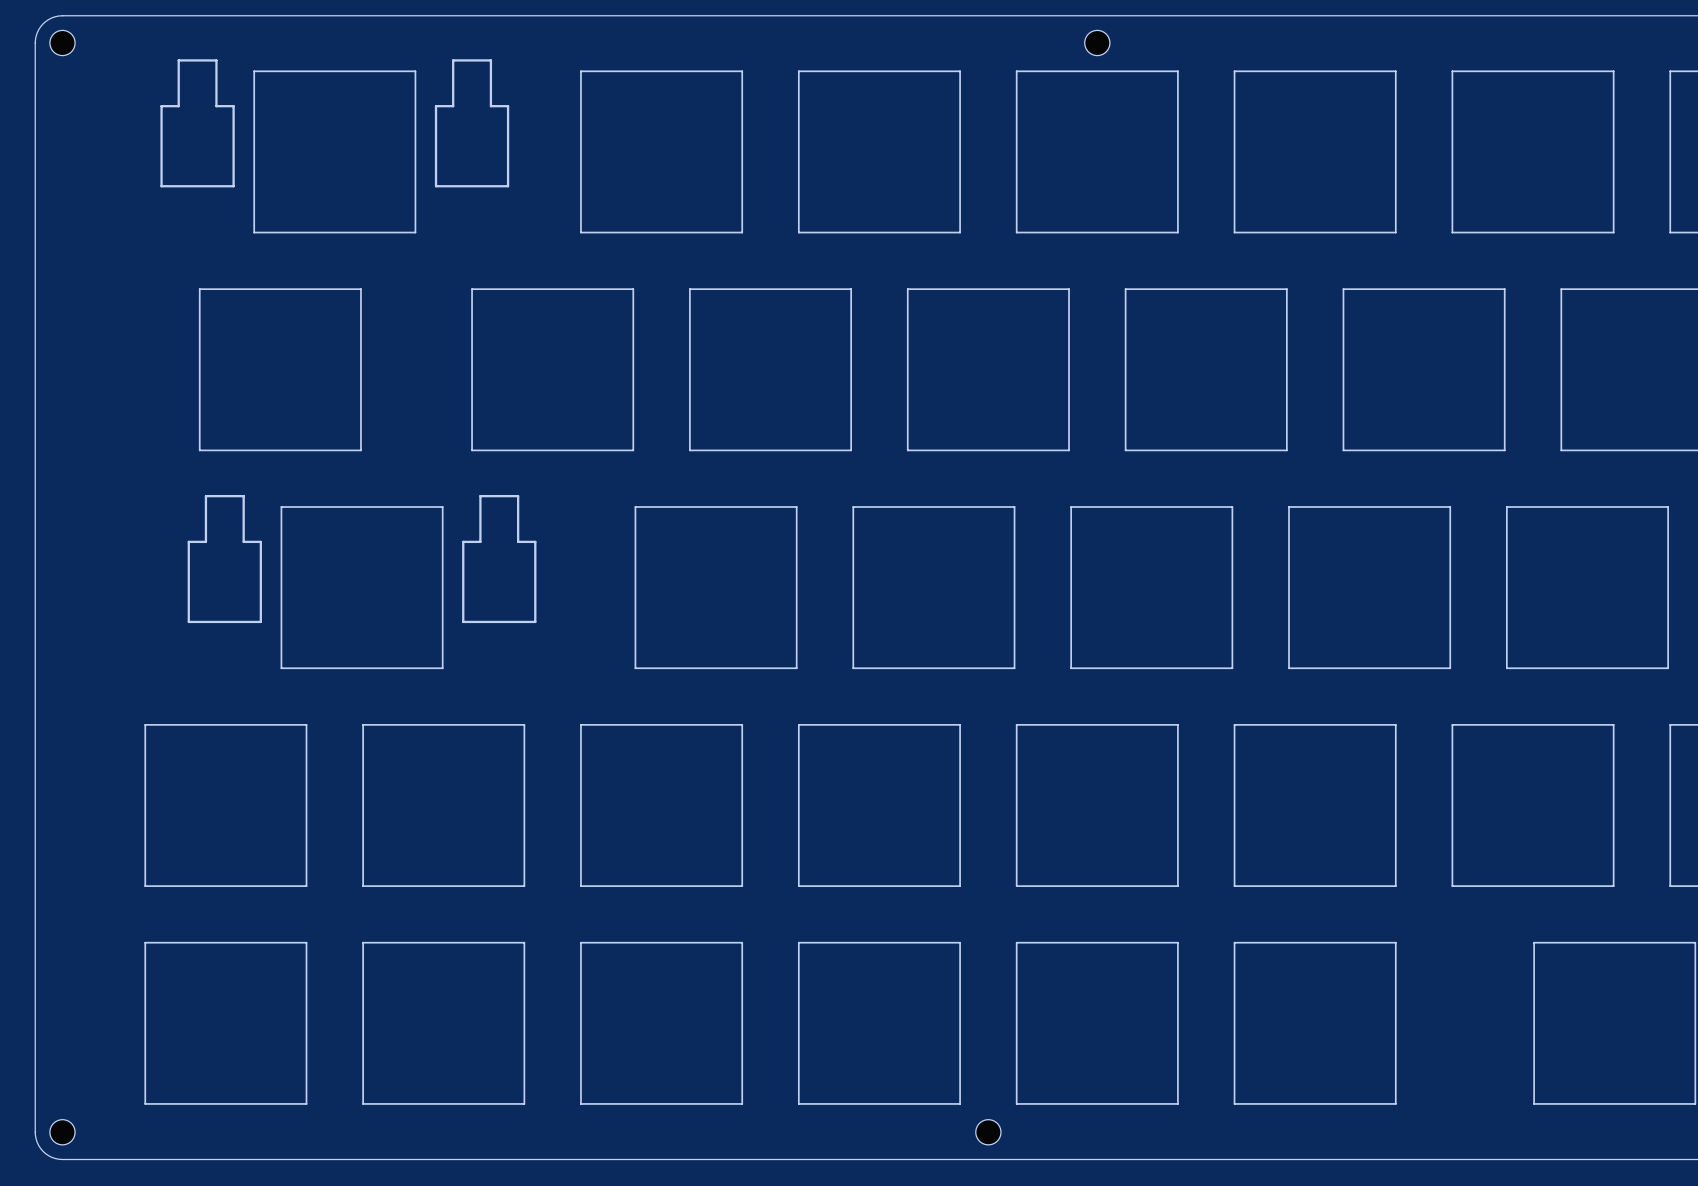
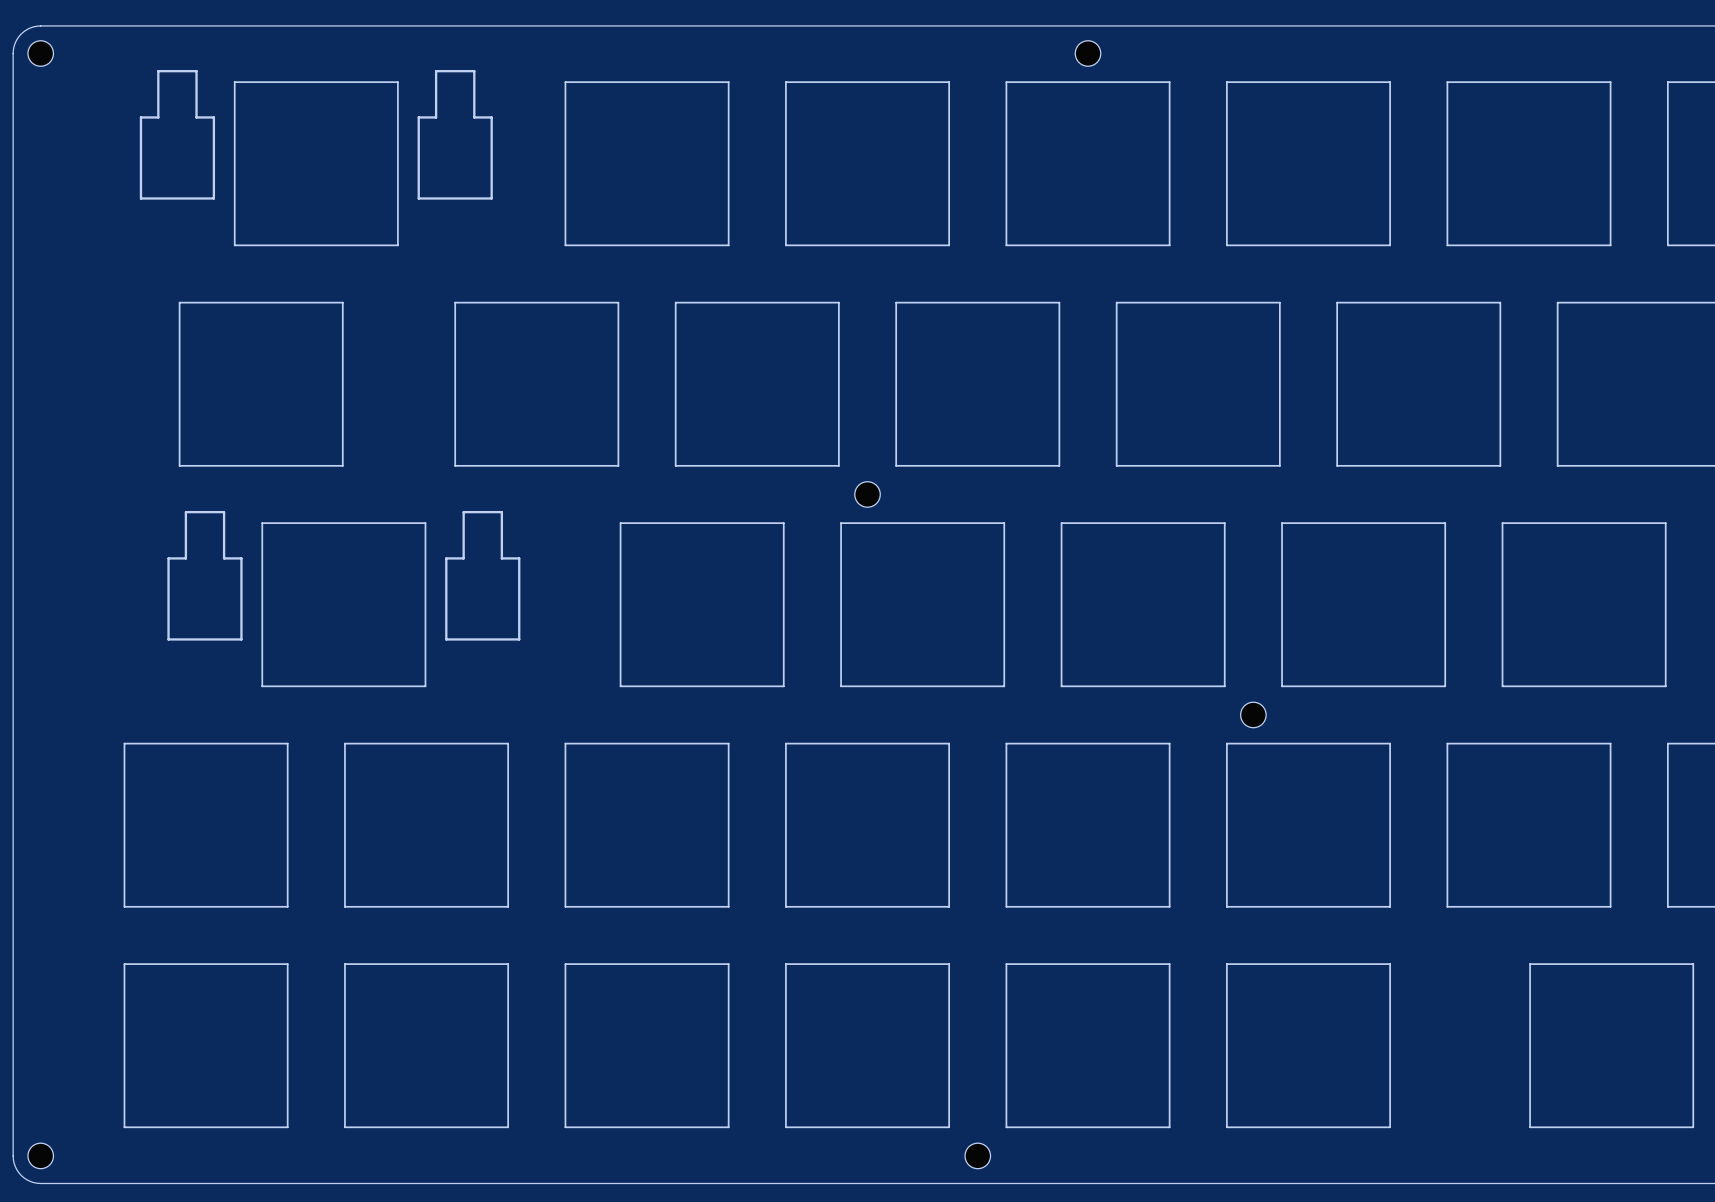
part: none -> (867, 494)
part: none -> (1253, 714)

